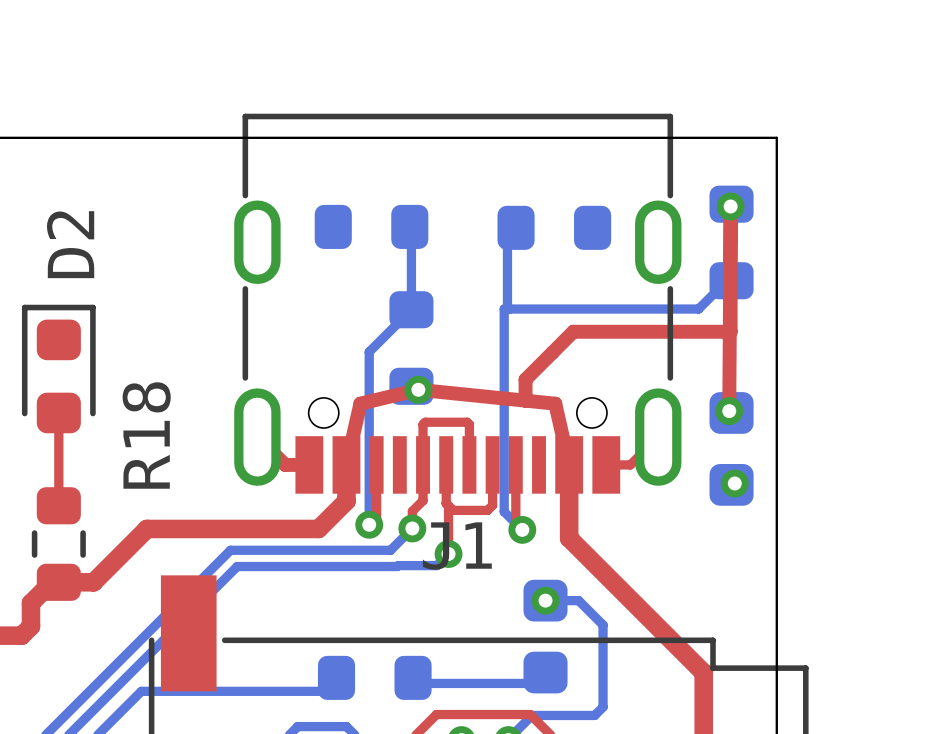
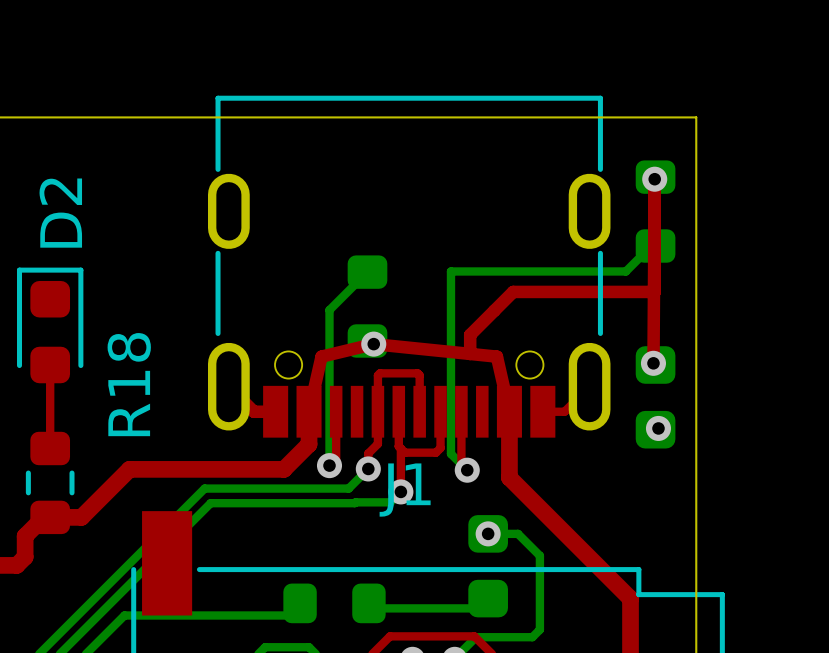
part: (371, 226) -> none
bottom track: (409, 226) (411, 228) (411, 309) -> none
bottom track: (516, 227) (507, 236) (507, 307) (509, 309) -> none
part: (554, 227) -> none

